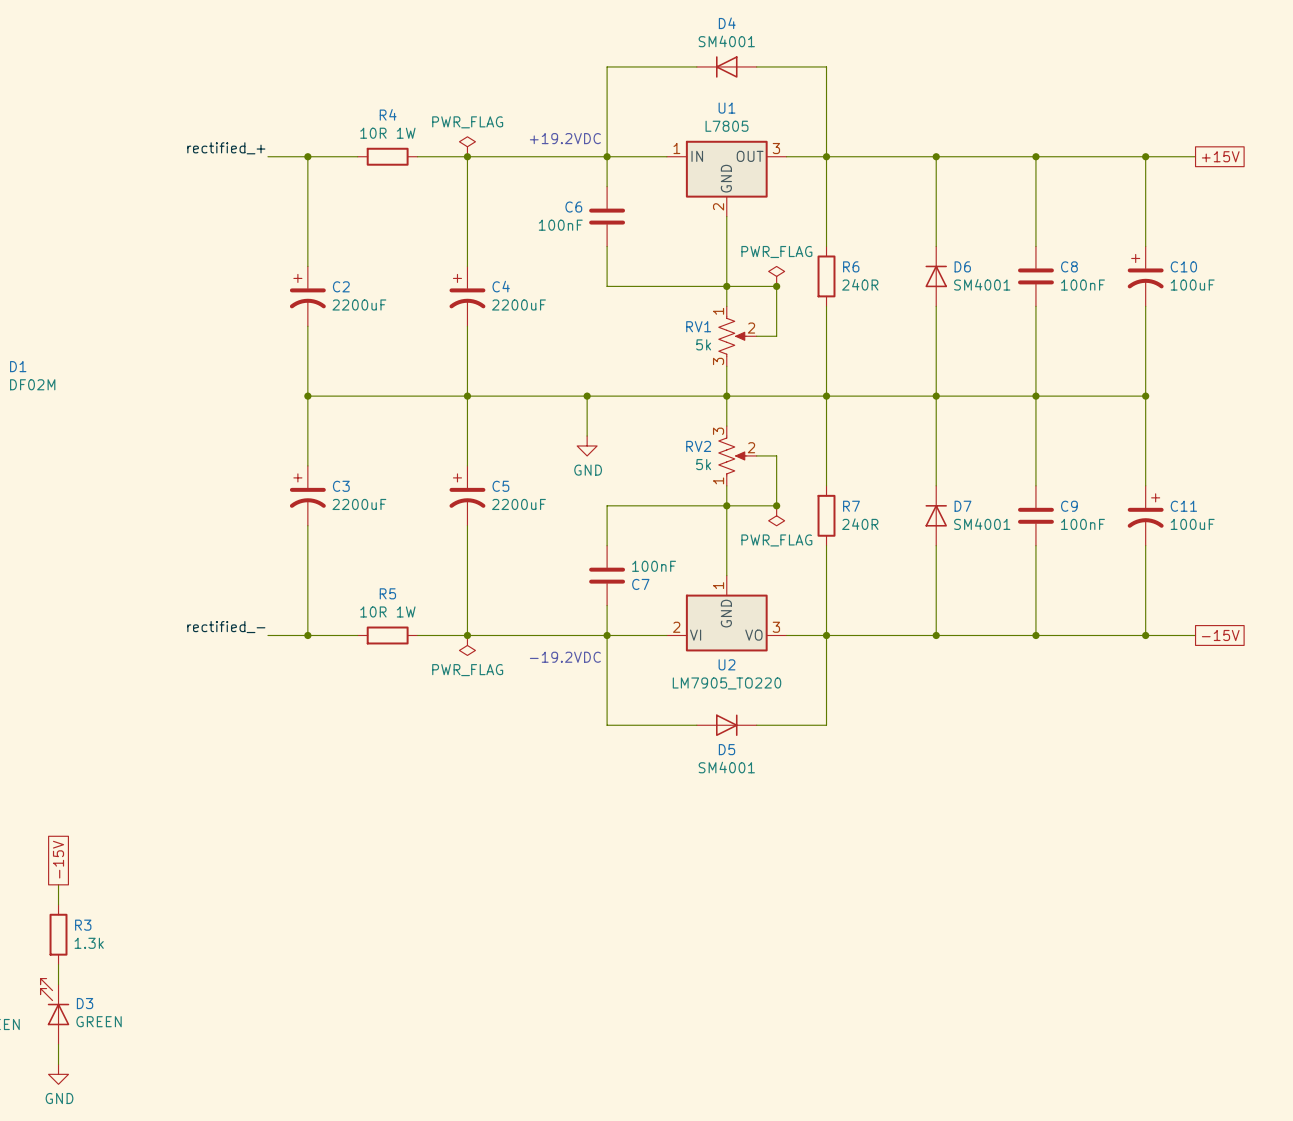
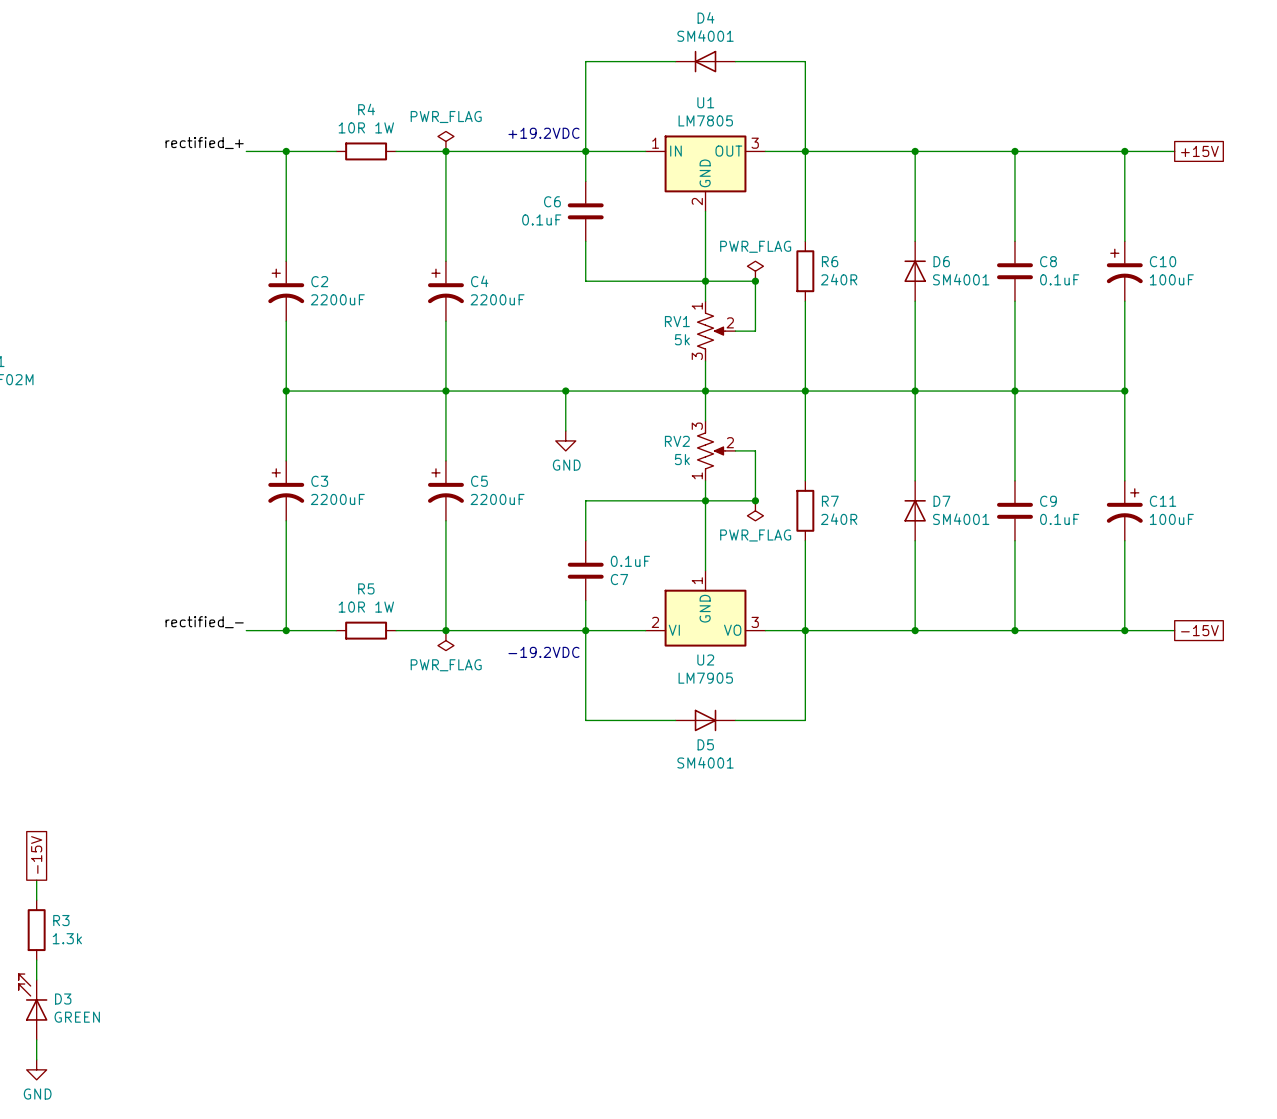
U1 value: L7805 (727, 126) -> LM7805 (705, 120)
C6 value: 100nF (560, 225) -> 0.1uF (541, 219)
C8 value: 100nF (1082, 285) -> 0.1uF (1059, 279)
C9 value: 100nF (1082, 524) -> 0.1uF (1059, 519)
C7 value: 100nF (654, 566) -> 0.1uF (630, 561)
U2 value: LM7905_TO220 (727, 683) -> LM7905 (705, 678)

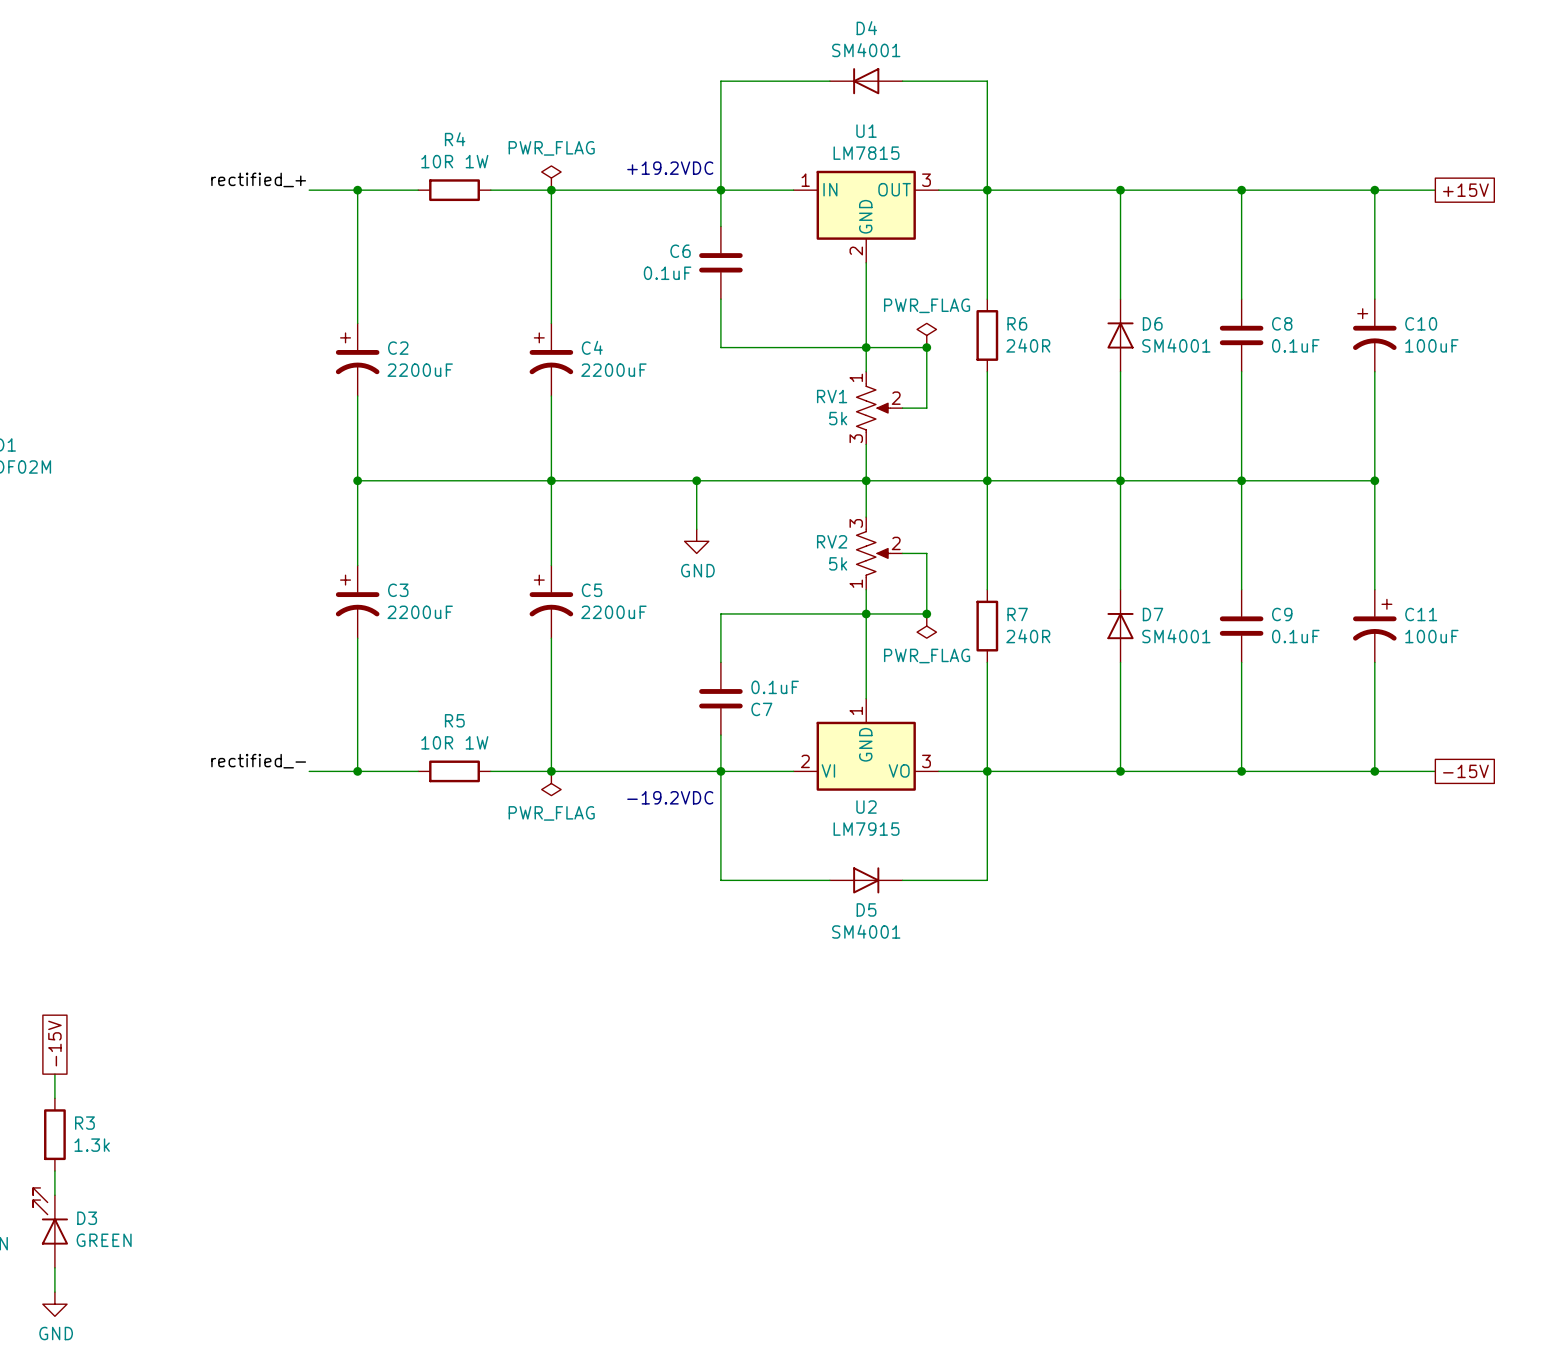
U1 value: LM7805 (705, 120) -> LM7815 (866, 153)
U2 value: LM7905 (705, 678) -> LM7915 (866, 829)

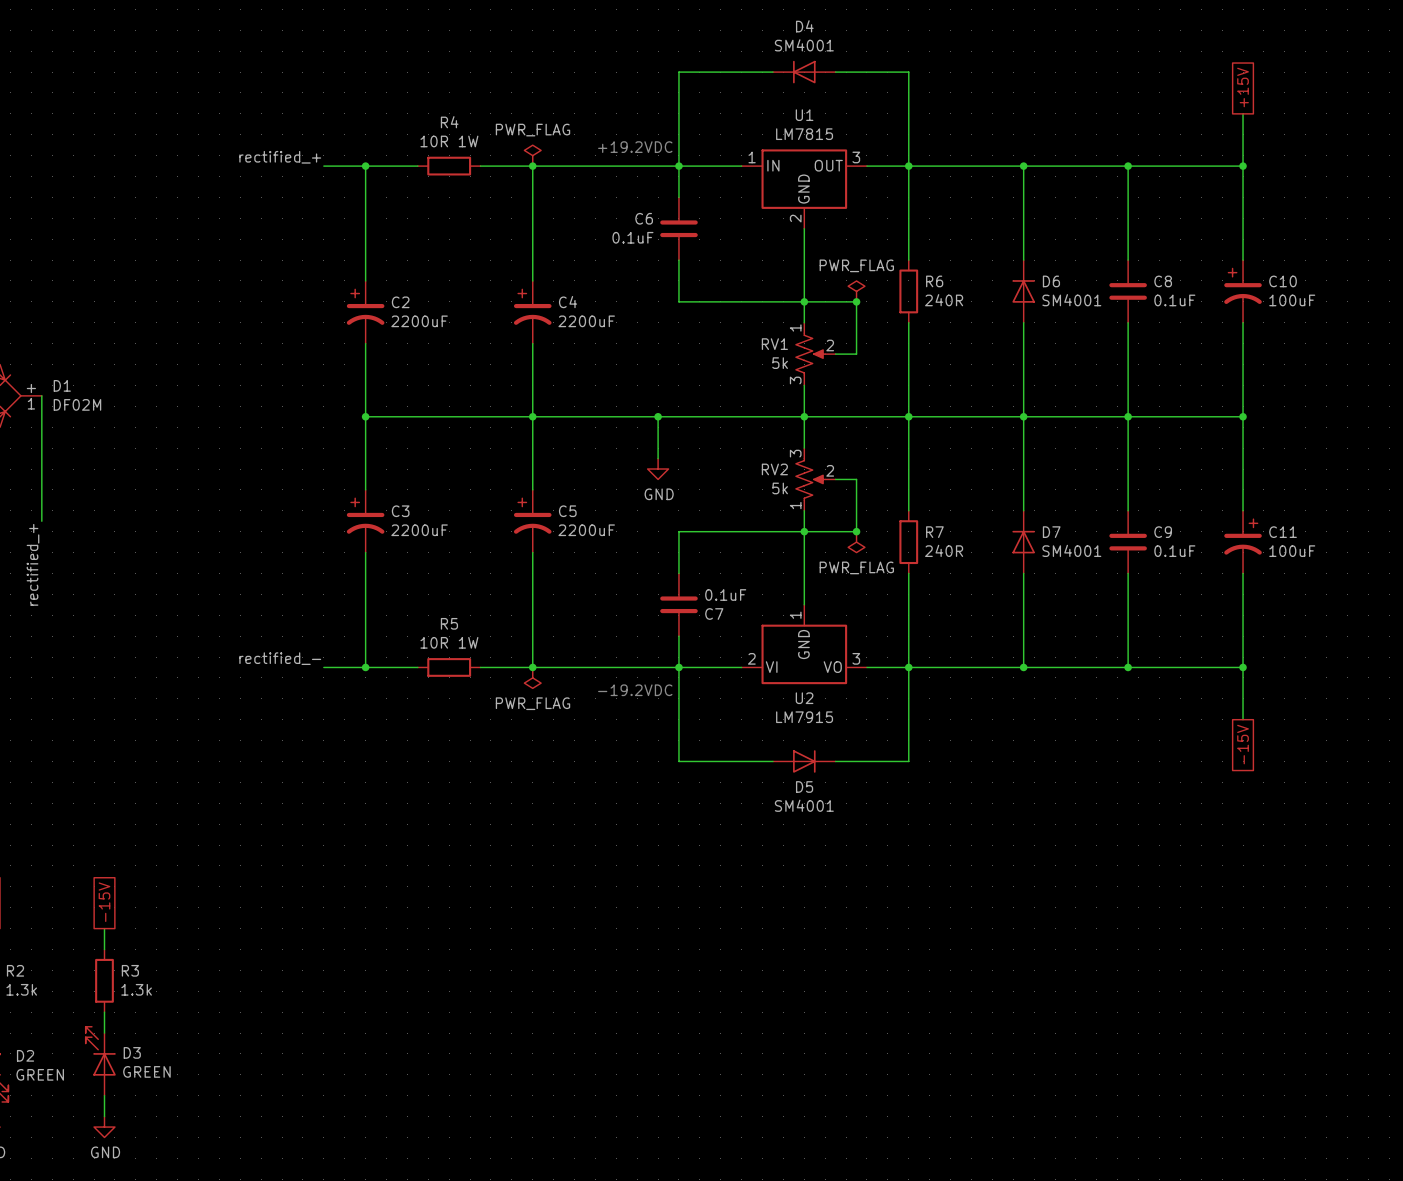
wire: (1374, 190) (1435, 190) -> (1243, 166) (1243, 113)
global label rotation: 0° (1465, 190) -> 90° counterclockwise (1243, 87)
global label position: +15V (1465, 190) -> +15V (1243, 87)
wire: (1374, 771) (1435, 771) -> (1243, 667) (1243, 719)
global label rotation: 0° (1465, 771) -> 90° clockwise (1243, 744)
global label position: -15V (1465, 771) -> -15V (1243, 744)

